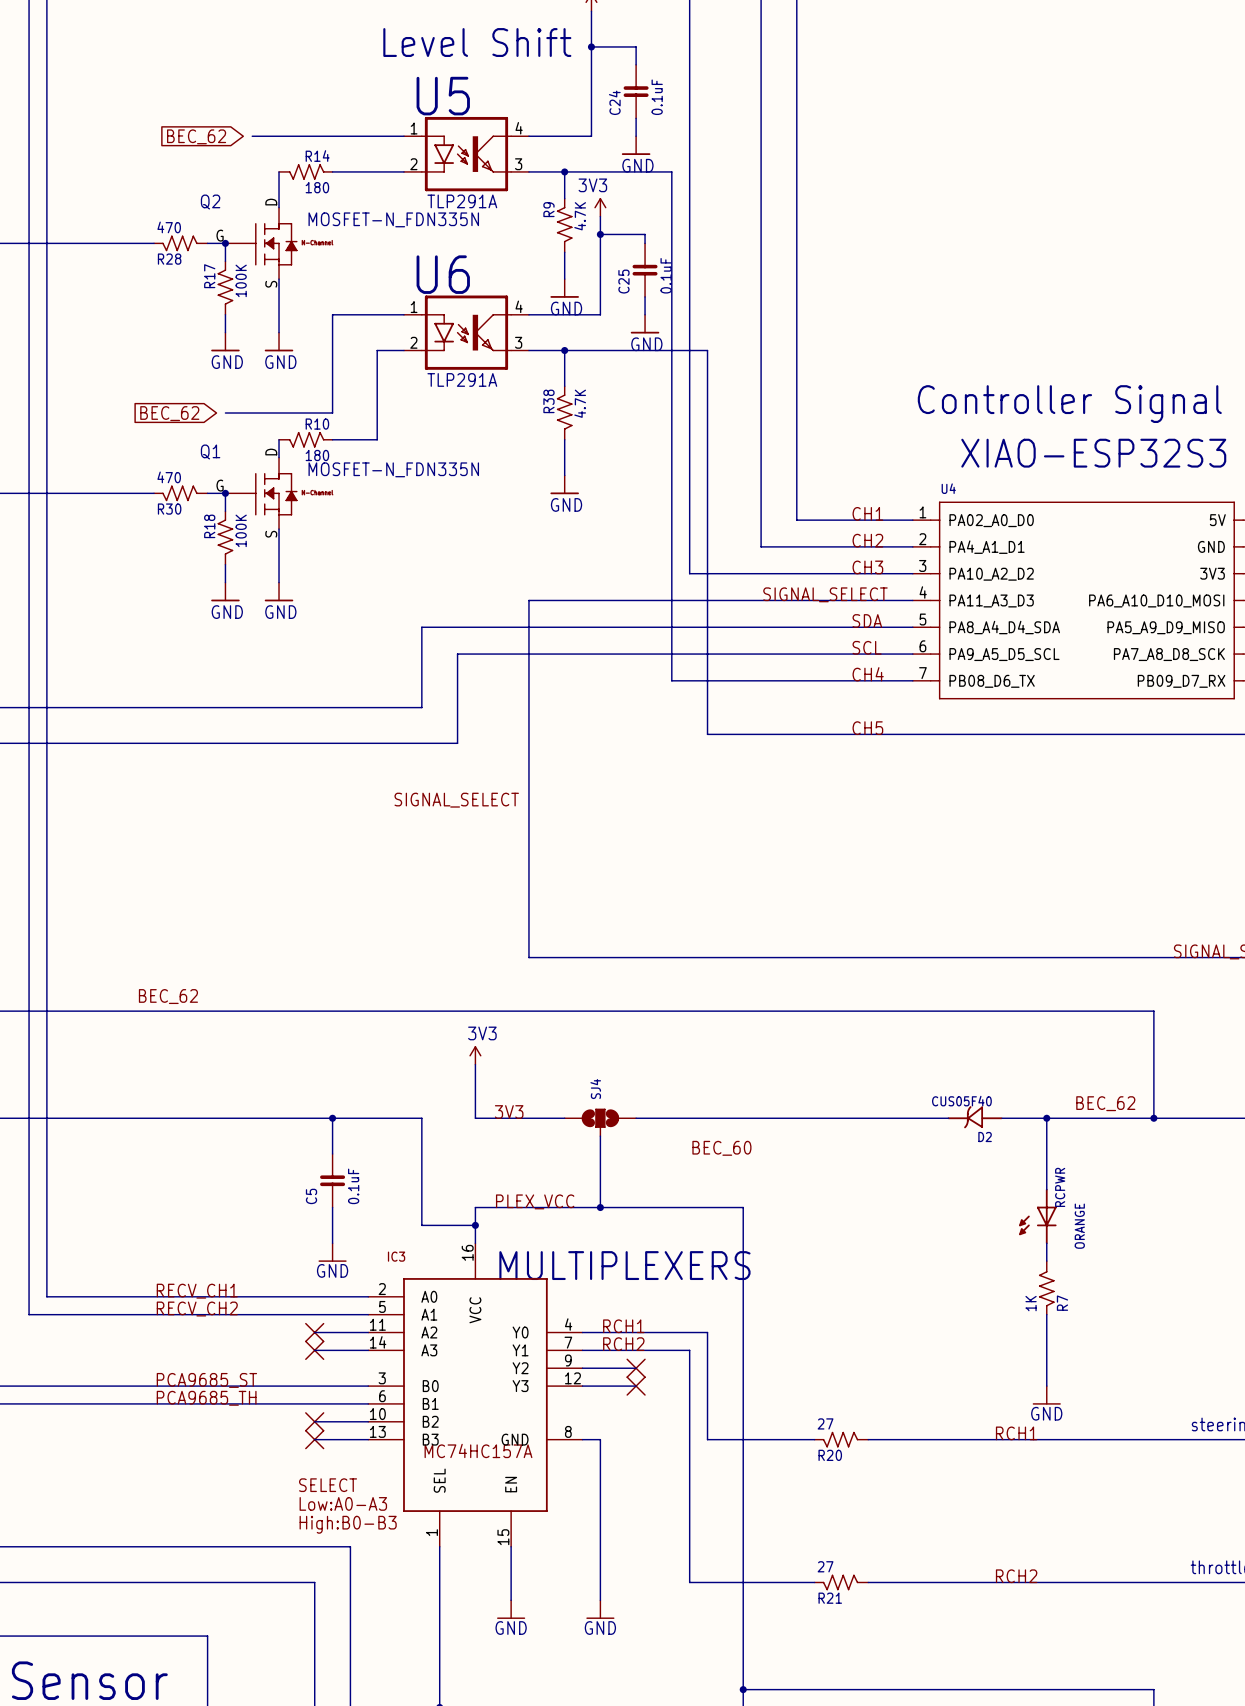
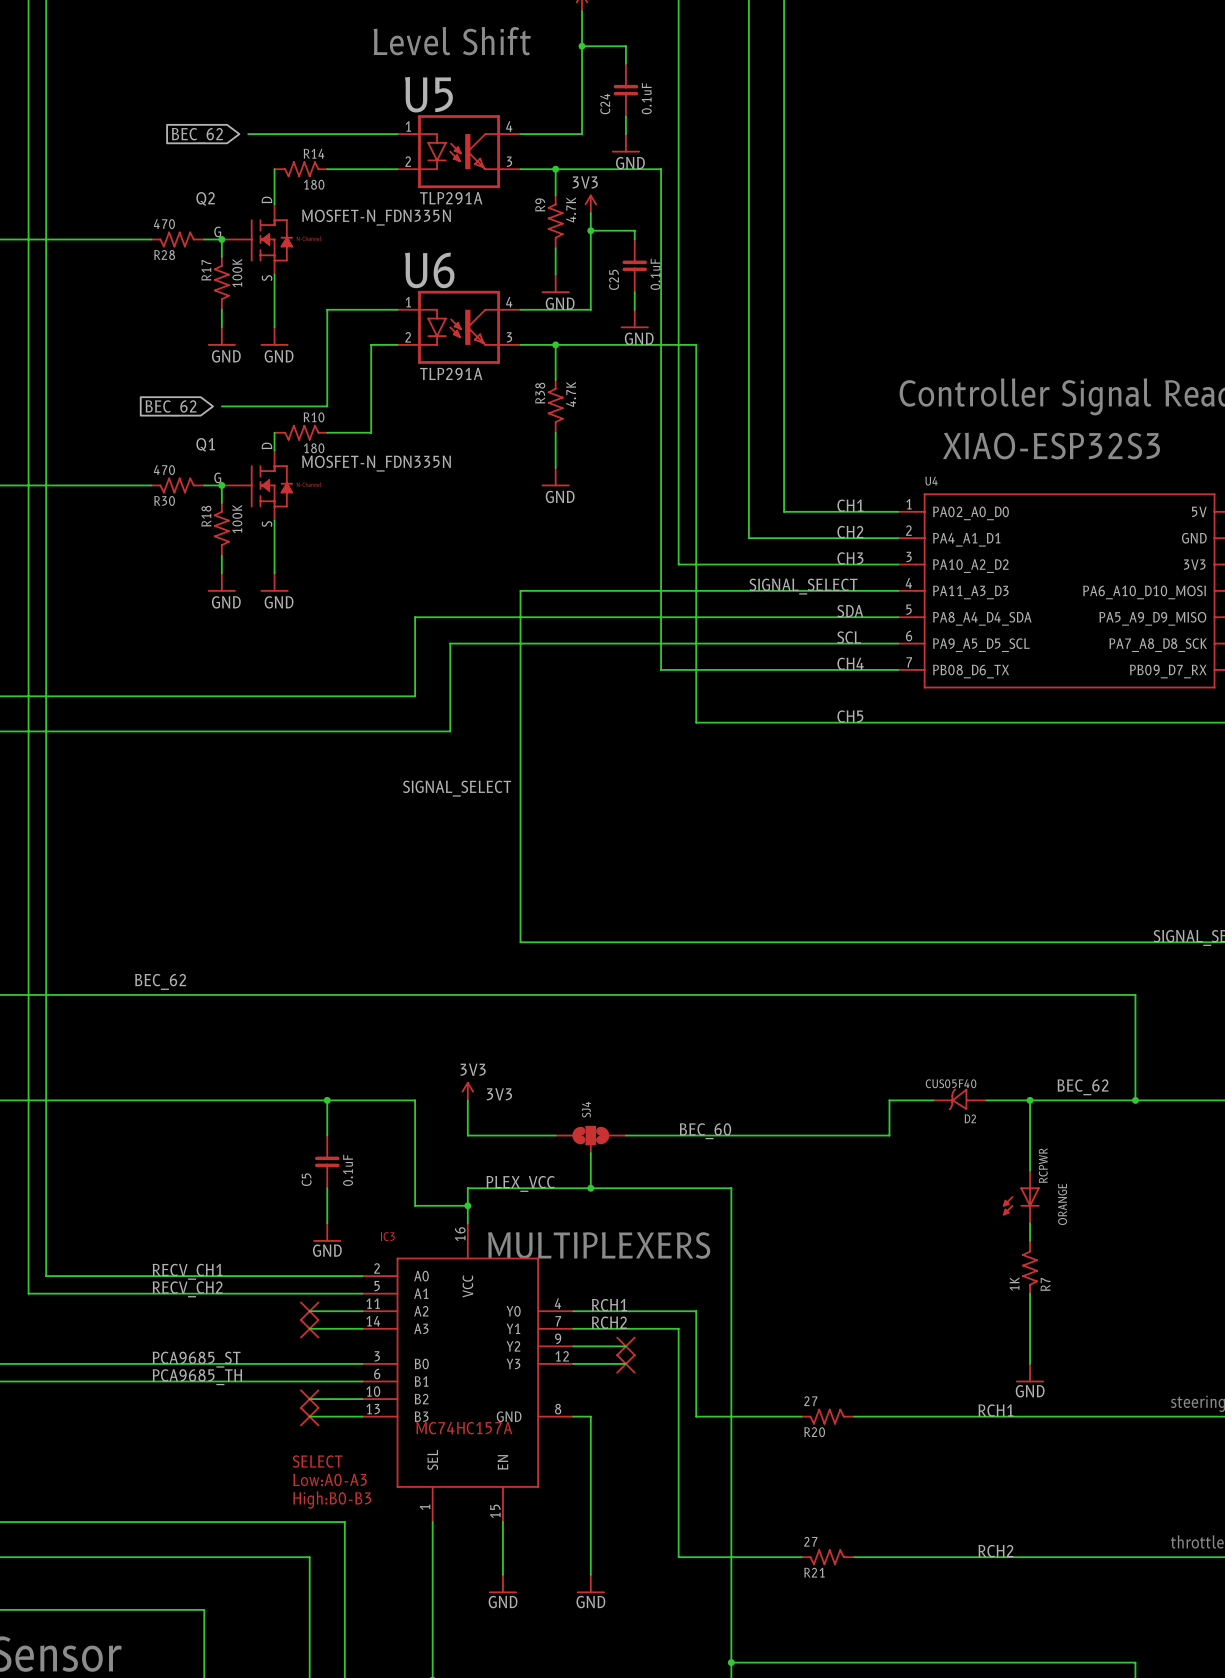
power symbol position: 3V3 (475, 1055) -> 3V3 (467, 1091)
wire: (475, 1064) (475, 1118) (564, 1118) -> none
wire: none -> (467, 1100) (467, 1135) (555, 1135)
wire: (636, 1118) (903, 1118) -> (625, 1135) (889, 1135) (889, 1100)
SJ4 position: (600, 1122) -> (590, 1139)

